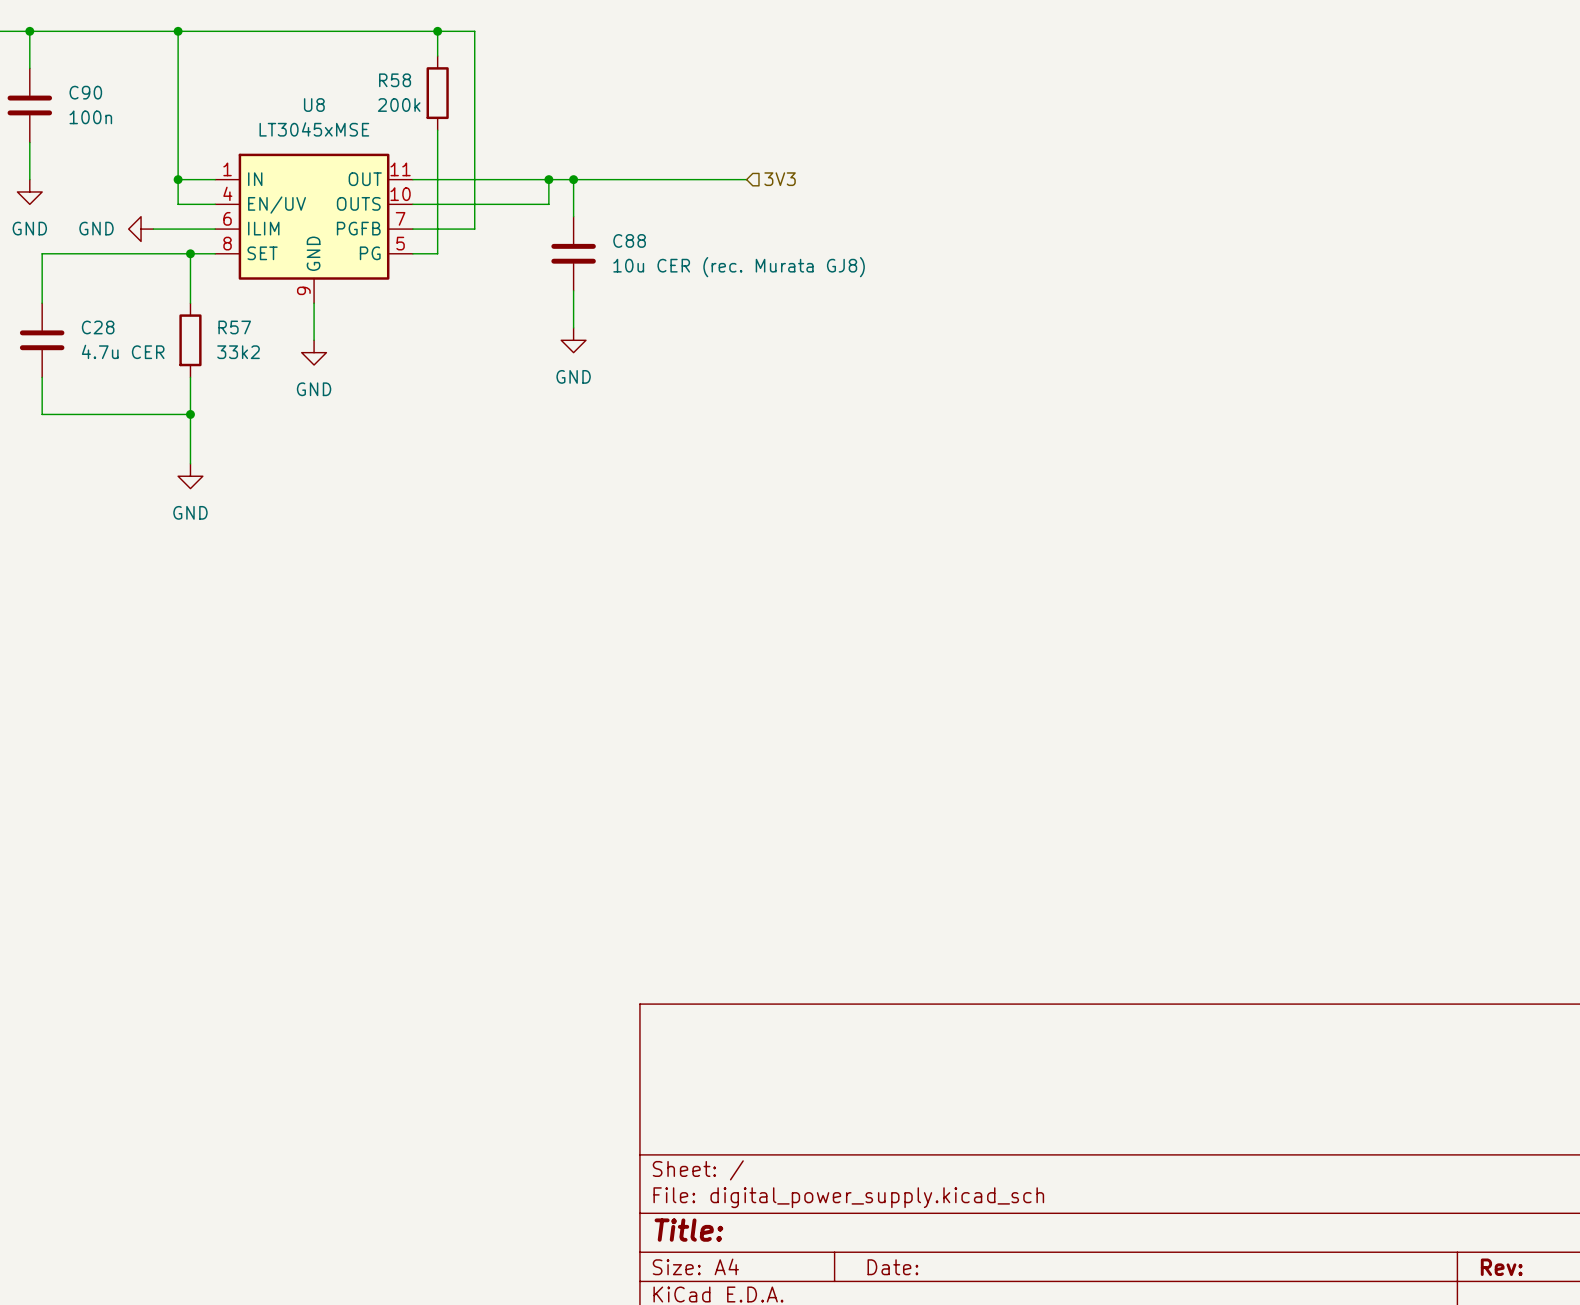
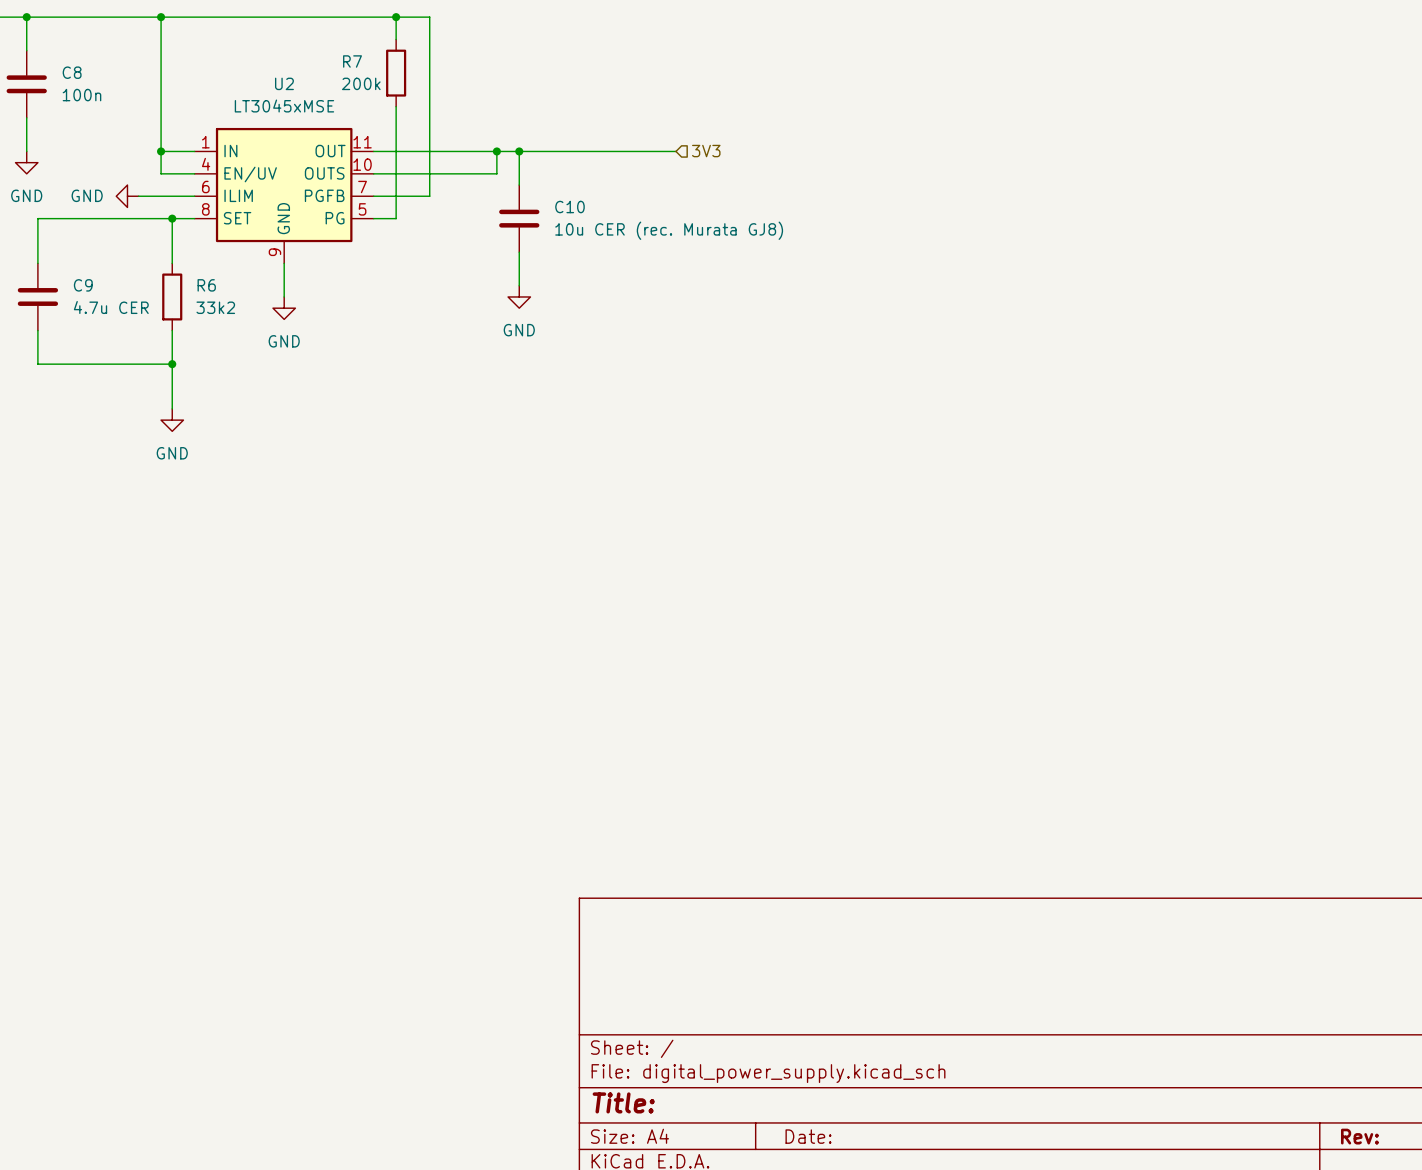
R58 name: R58 (395, 80) -> R7 (352, 61)
C90 name: C90 (85, 92) -> C8 (72, 72)
U8 name: U8 (314, 105) -> U2 (284, 83)
C88 name: C88 (629, 240) -> C10 (569, 207)
C28 name: C28 (98, 327) -> C9 (83, 285)
R57 name: R57 (234, 327) -> R6 (206, 285)

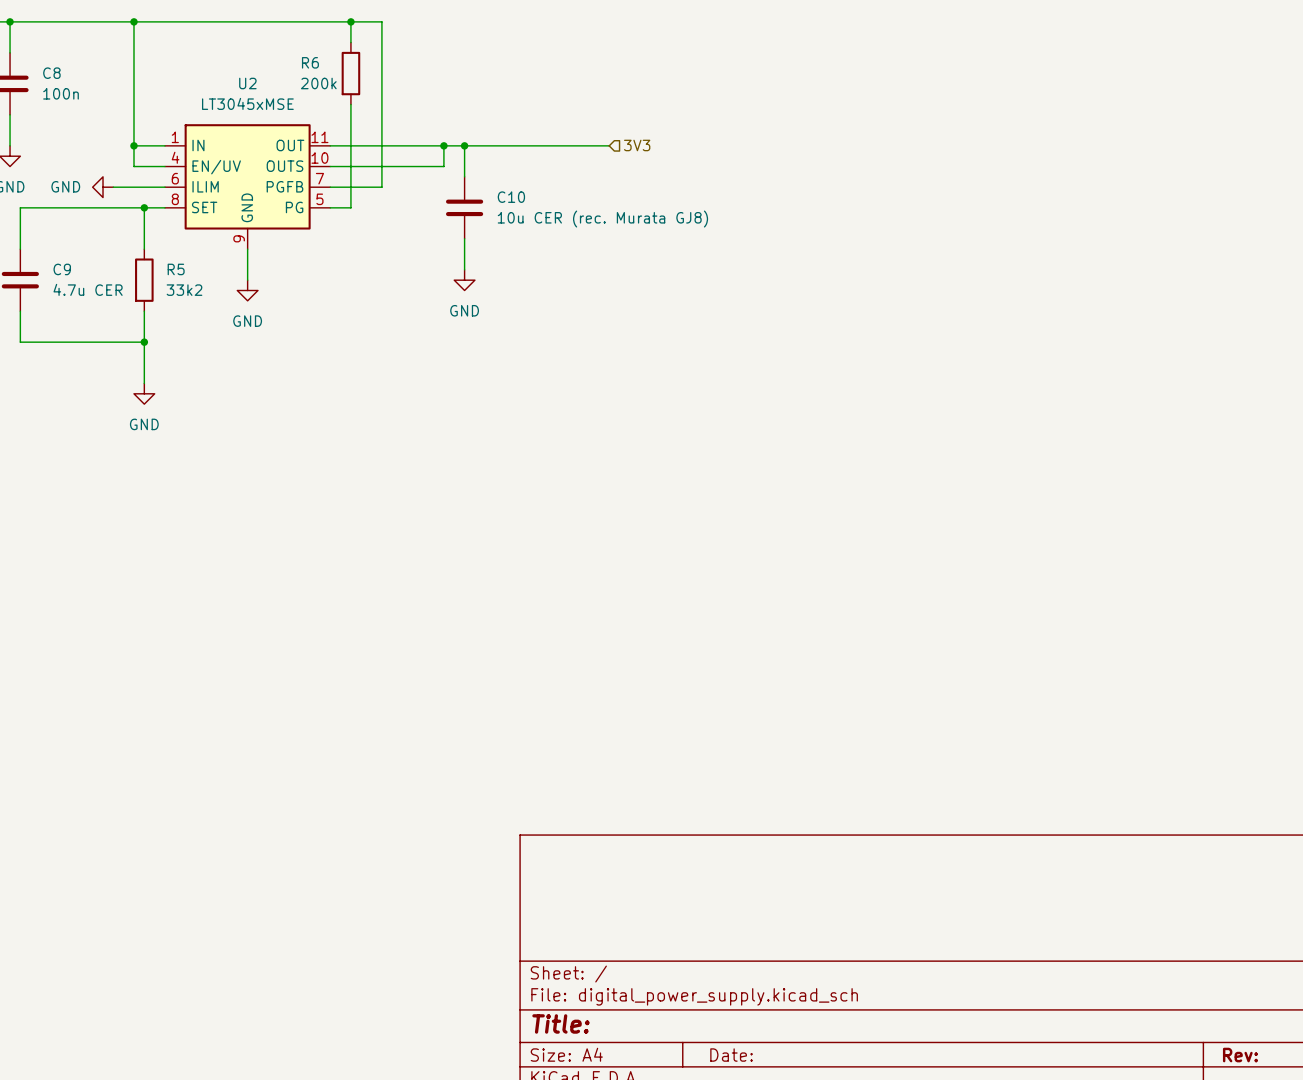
R7 name: R7 (352, 61) -> R6 (310, 62)
R6 name: R6 (206, 285) -> R5 (176, 269)

